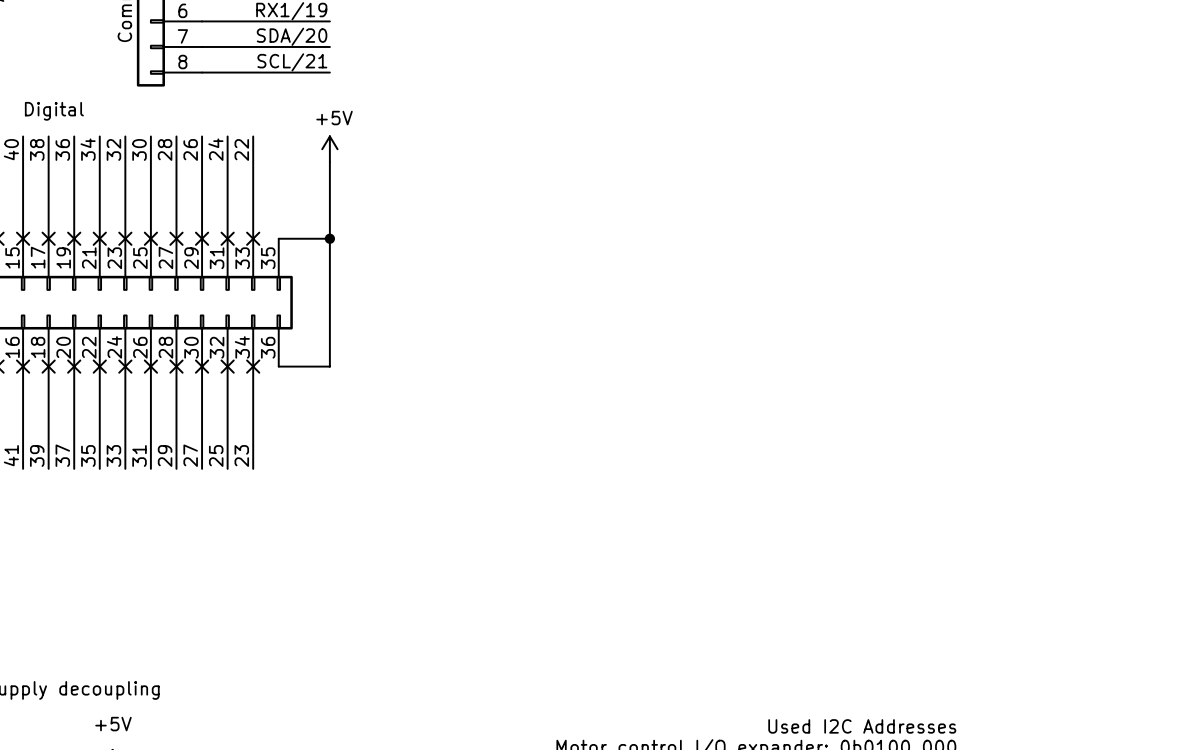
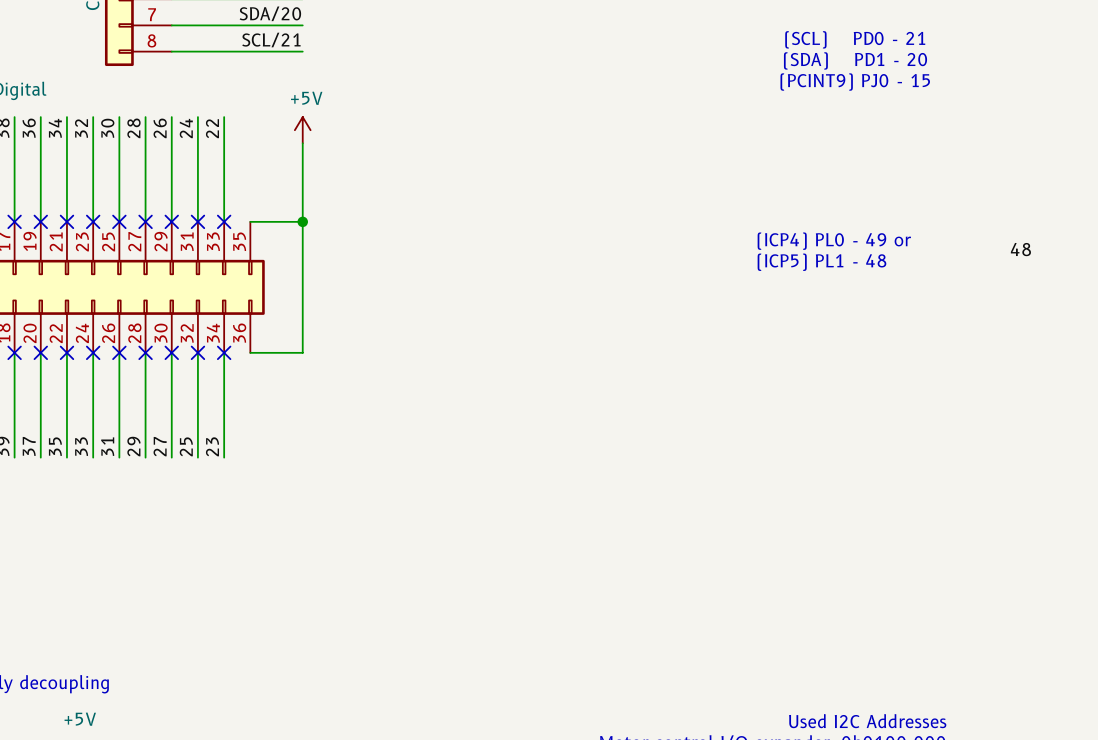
text: none -> (SCL) PD0 - 21 (855, 39)
text: none -> (SDA) PD1 - 20 (855, 60)
text: none -> (PCINT9) PJ0 - 15 (855, 82)
text: none -> (ICP4) PL0 - 49 or (834, 241)
label: none -> 48 (1020, 249)
text: none -> (ICP5) PL1 - 48 (821, 262)

